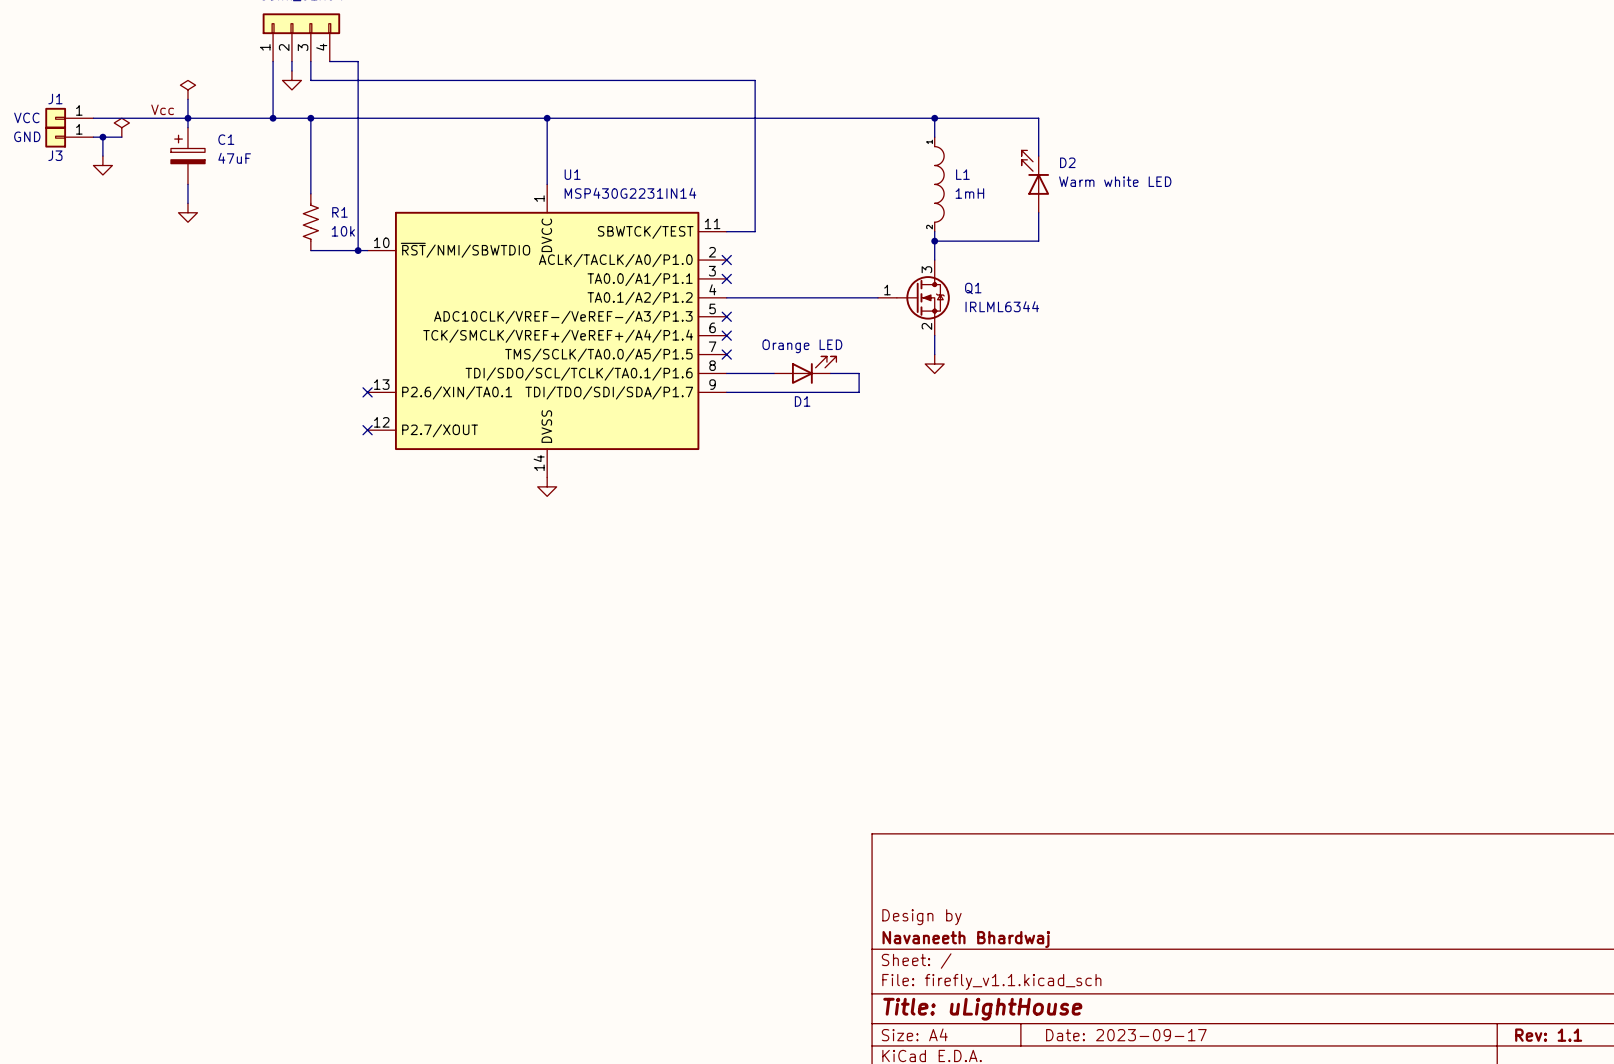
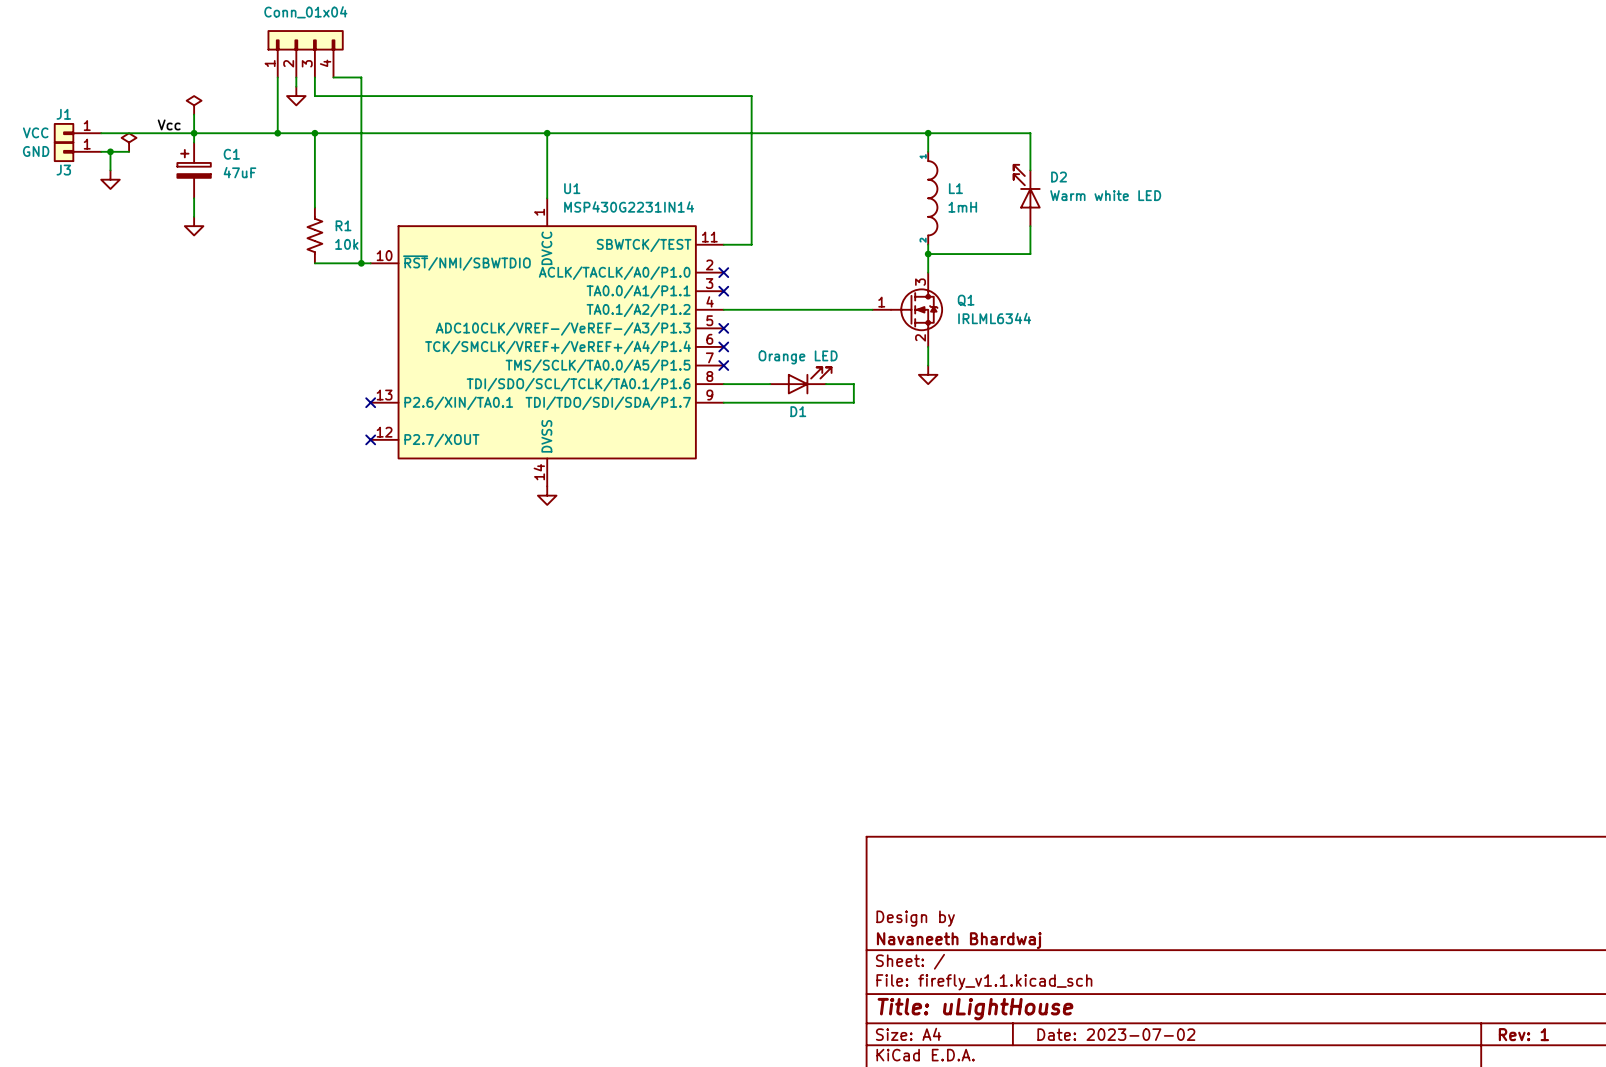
title block: Date: 2023-09-17 (1126, 1035) -> Date: 2023-07-02 (1116, 1034)
title block: Rev: 1.1 (1548, 1035) -> Rev: 1 (1523, 1034)

